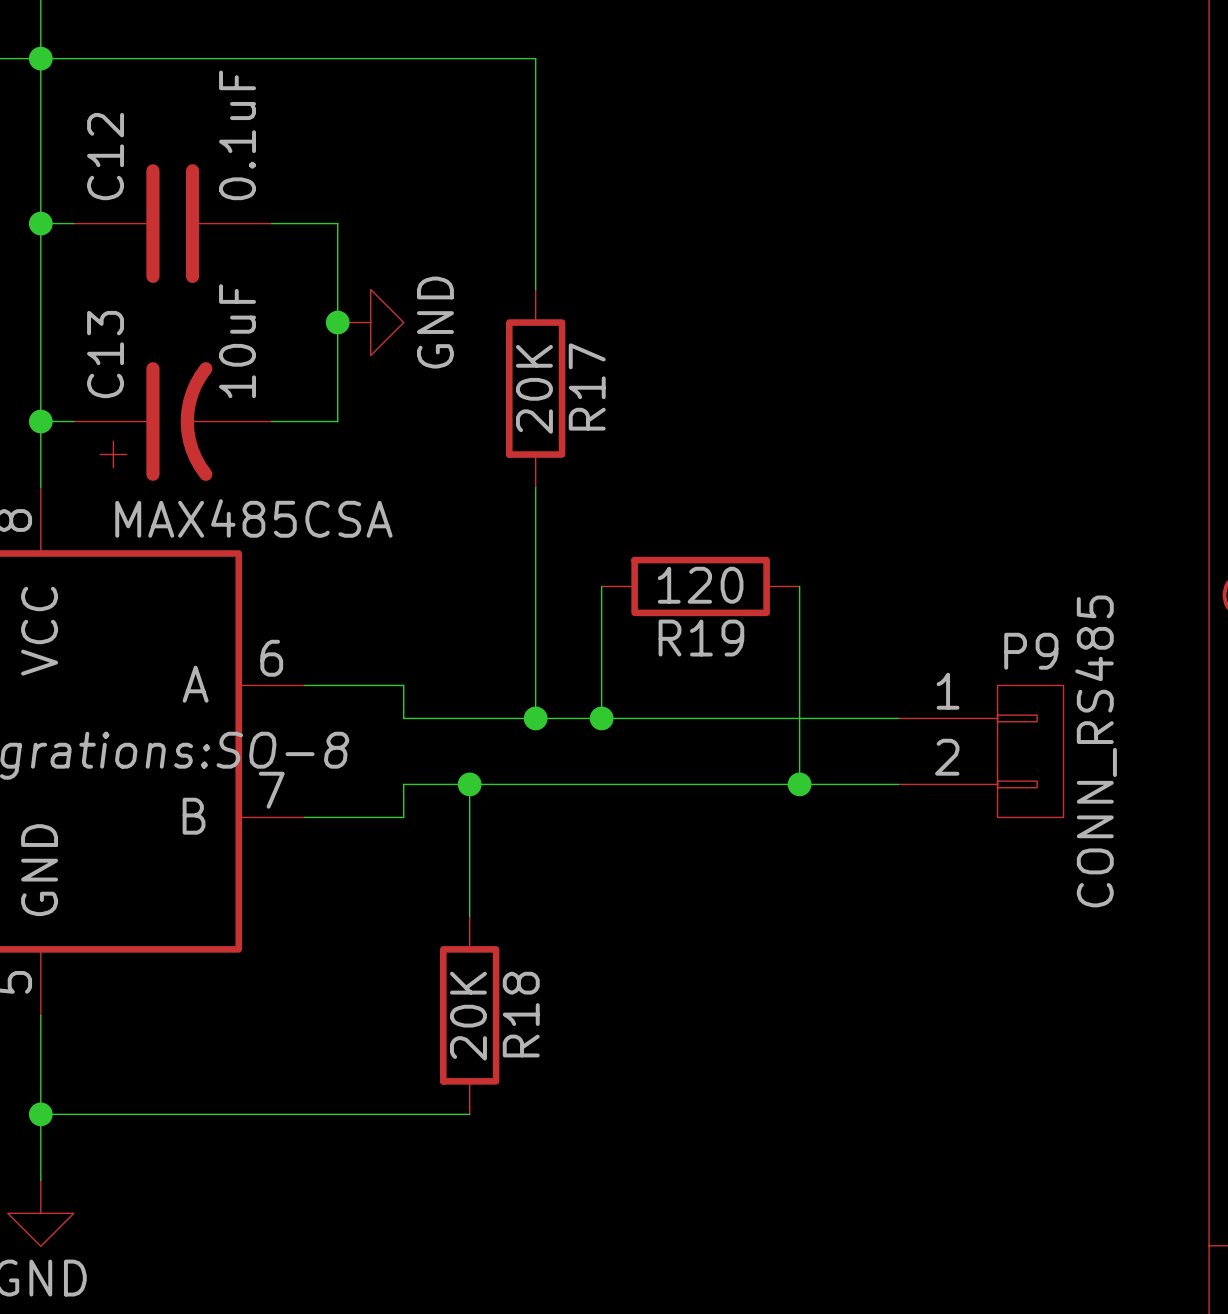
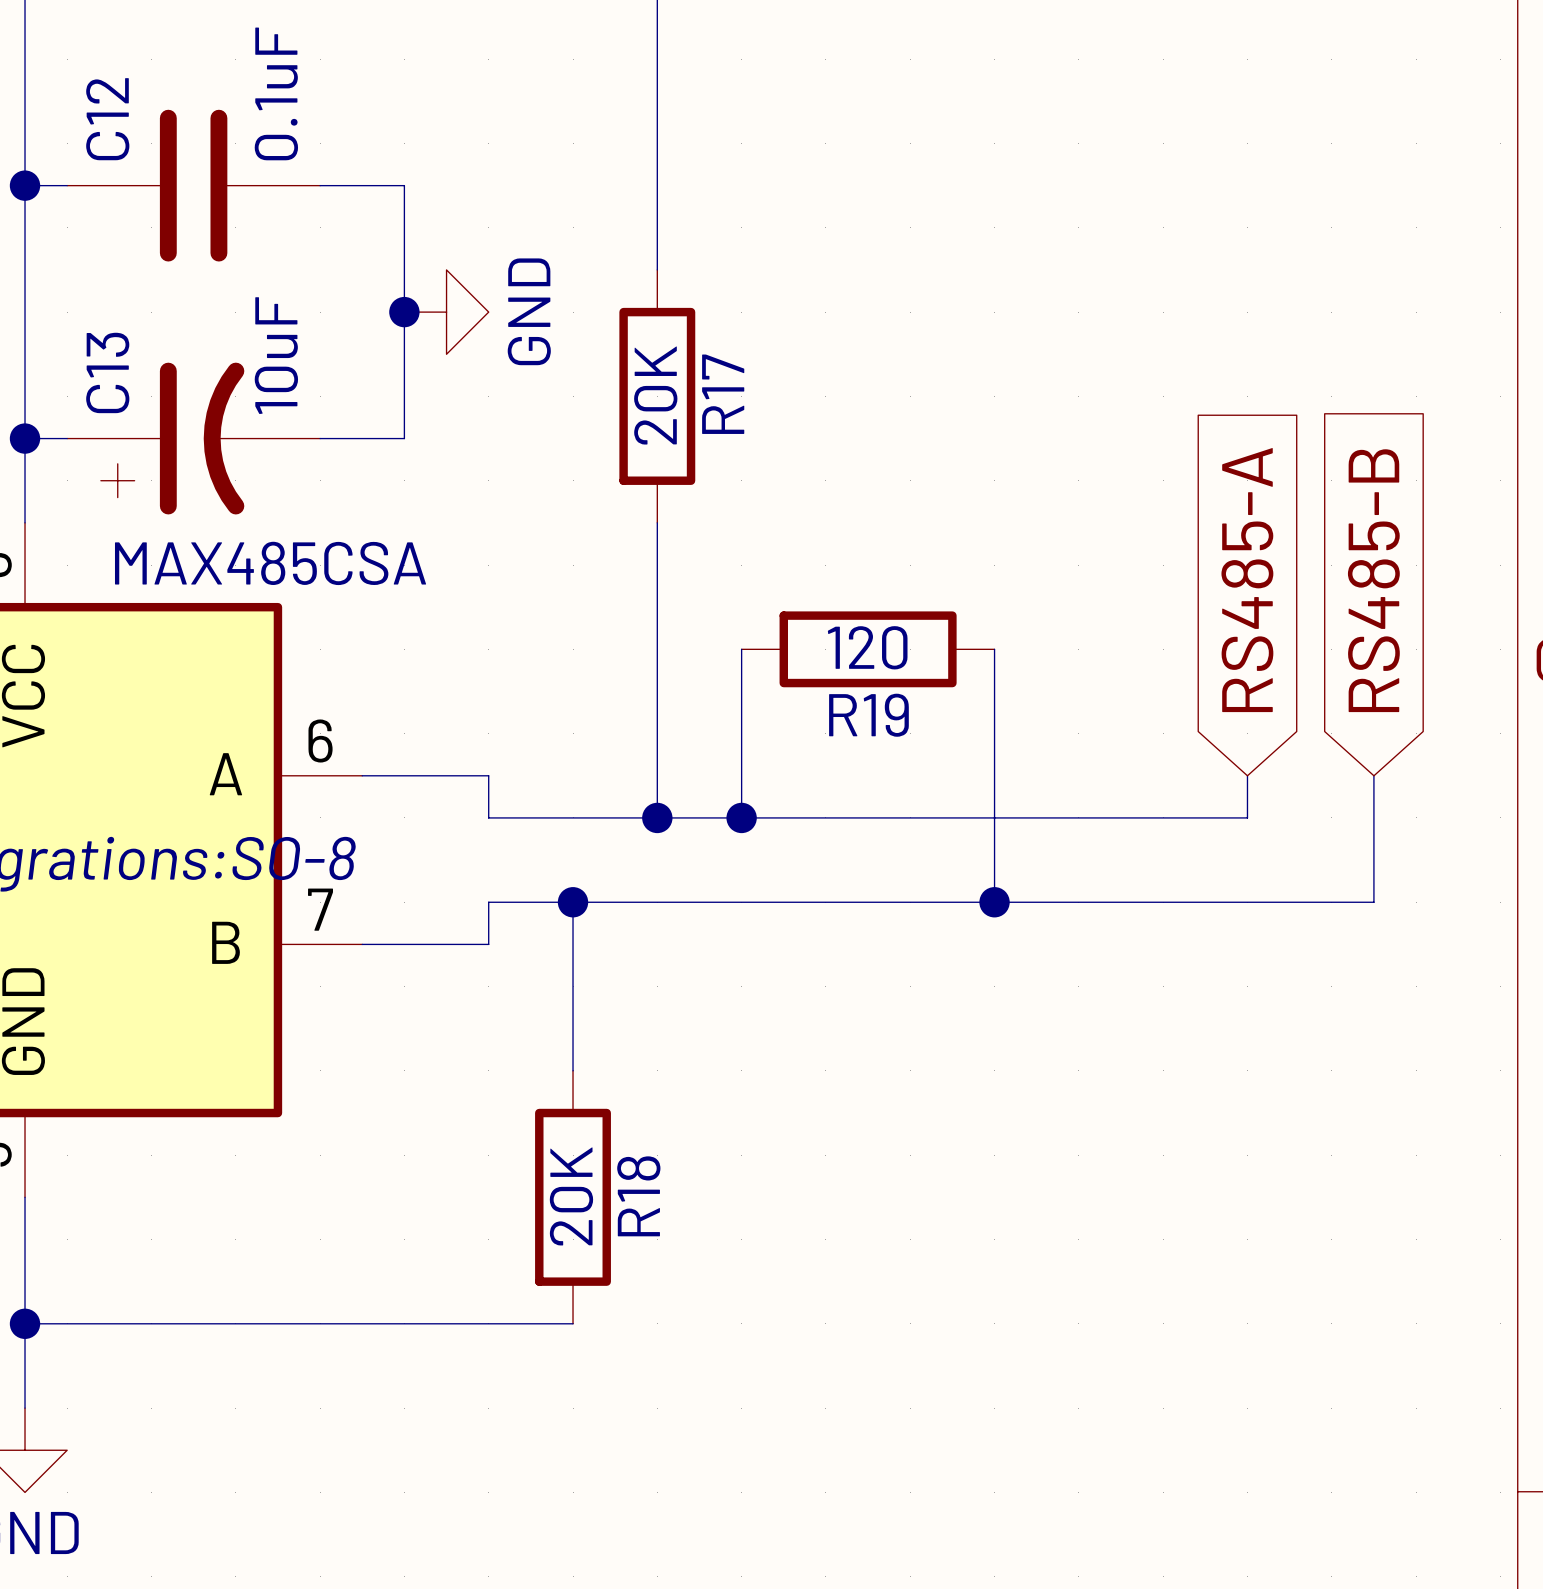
global label: none -> RS485-B (1373, 580)
global label: none -> RS485-A (1247, 580)
wire: none -> (1373, 775) (1373, 902) (1121, 902)
P9: CONN_RS485 (981, 751) -> none

